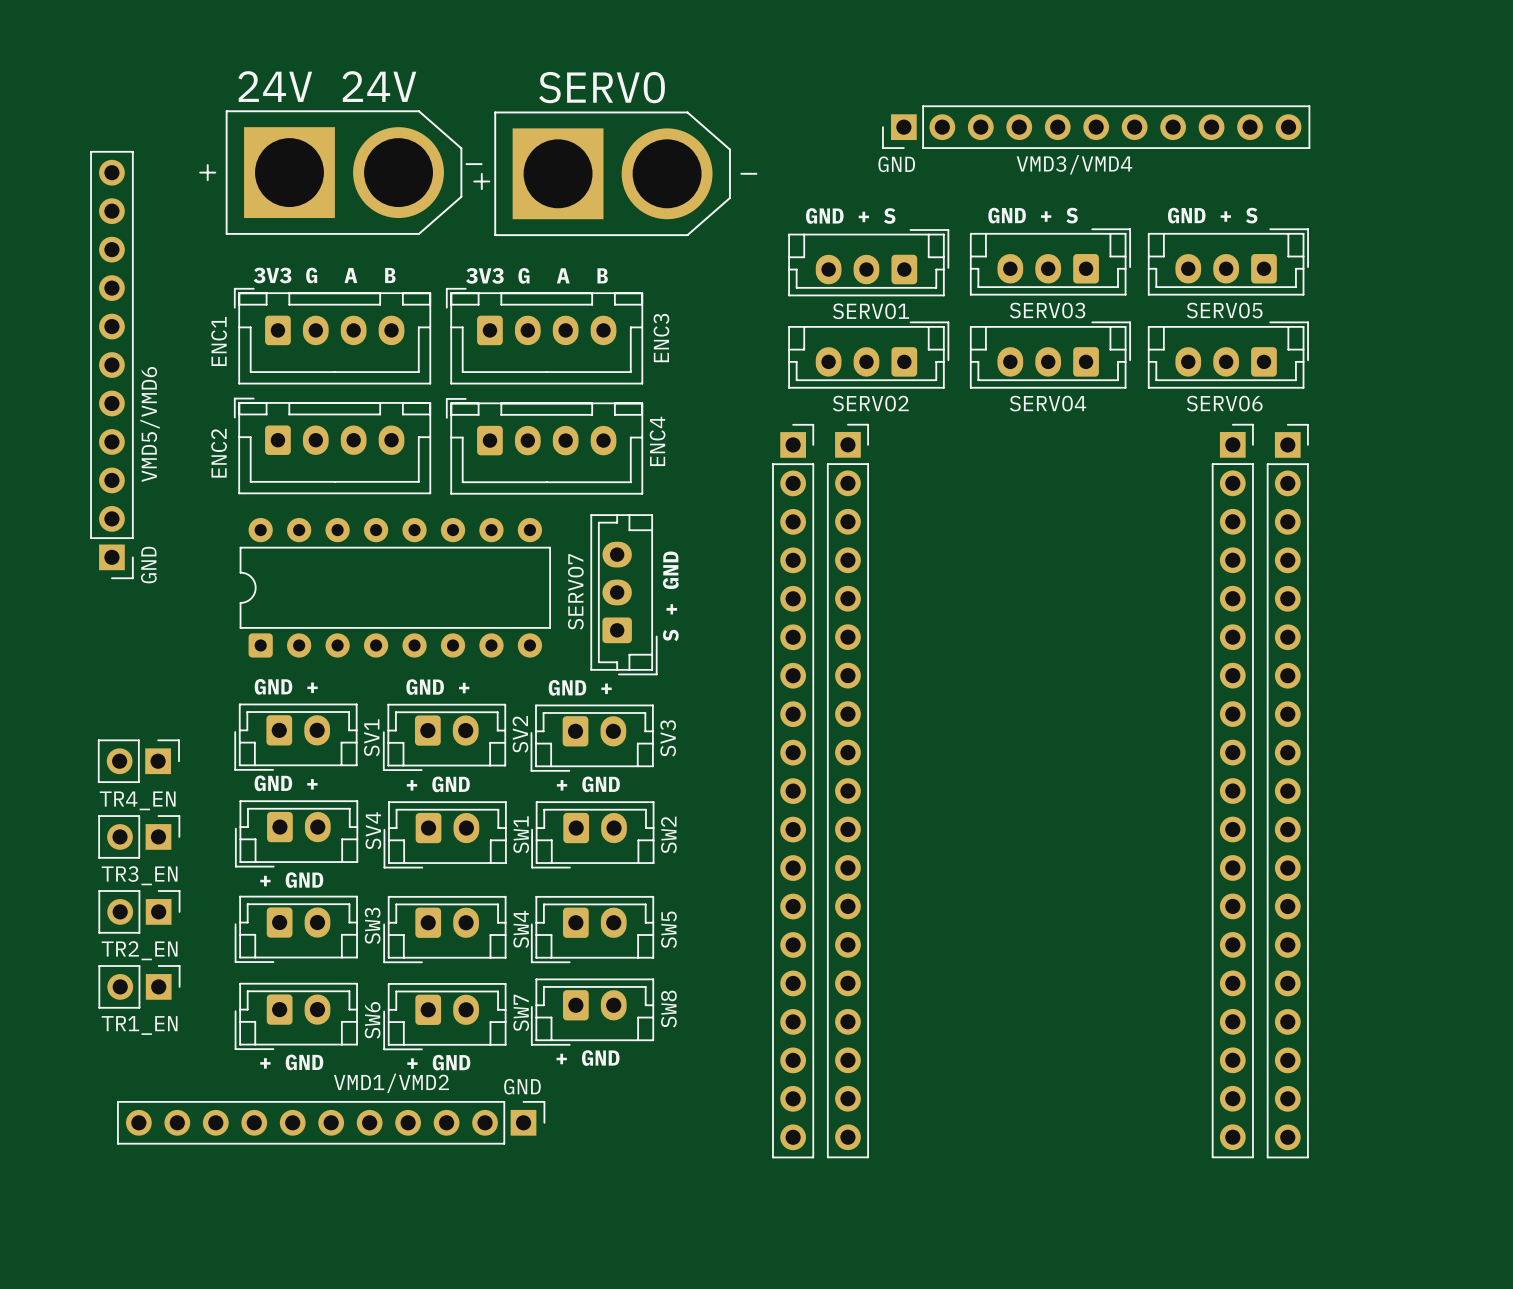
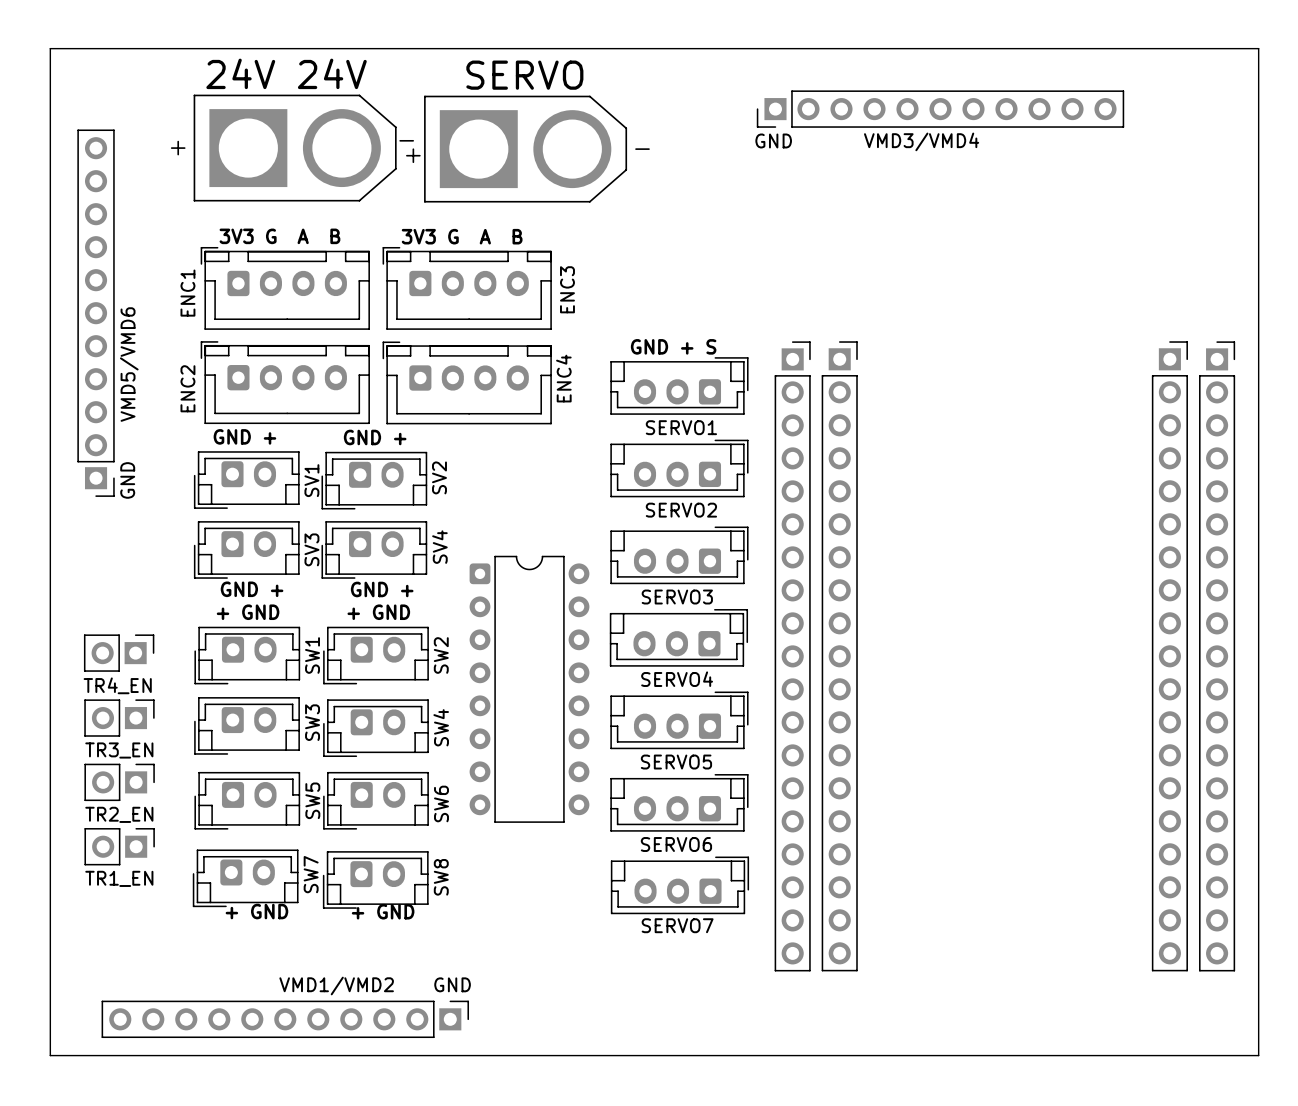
board edge: none -> (50, 48) (1258, 48) (1258, 1055) (50, 1055) (50, 48)
text: GND + S (850, 215) -> none
text: GND + S (1033, 215) -> none
text: GND + S (1212, 215) -> none
SERVO3 position: (1050, 261) -> (679, 555)
SERVO5 position: (1228, 261) -> (679, 720)
SERVO1 position: (868, 262) -> (679, 385)
SERVO2 position: (868, 355) -> (679, 468)
SERVO4 position: (1050, 355) -> (678, 637)
SERVO6 position: (1228, 355) -> (679, 802)
text: none -> GND + S (673, 346)
text: none -> GND + (244, 436)
text: none -> GND + (375, 437)
part rotation: 0° (395, 587) -> 90° clockwise (529, 689)
part position: (395, 587) -> (529, 689)
SERVO7 rotation: 0° (623, 594) -> 90° counterclockwise (679, 885)
SERVO7 position: (623, 594) -> (679, 885)
text: S + GND (670, 596) -> none
text: GND + (580, 687) -> none
text: none -> + GND (248, 612)
SV1 position: (295, 737) -> (246, 480)
SV2 position: (444, 737) -> (374, 480)
SV3 position: (592, 738) -> (246, 549)
part: none -> (839, 656)
part: none -> (1169, 656)
part: none -> (792, 656)
part: none -> (1217, 656)
text: GND + (286, 783) -> none
text position: + GND (438, 784) -> + GND (378, 612)
text: + GND (588, 784) -> none
part: (793, 791) -> none
part: (847, 791) -> none
part: (1232, 791) -> none
part: (1287, 791) -> none
SV4 position: (296, 833) -> (374, 549)
SW1 position: (445, 834) -> (247, 655)
SW2 position: (592, 834) -> (376, 655)
text: + GND (291, 880) -> none
SW3 position: (296, 929) -> (247, 725)
SW4 position: (444, 929) -> (376, 728)
SW5 position: (592, 929) -> (247, 800)
SW8 position: (592, 1012) -> (375, 879)
SW6 position: (296, 1016) -> (376, 800)
SW7 position: (444, 1016) -> (245, 878)
text: + GND (588, 1058) -> none
text position: GND (522, 1086) -> GND (452, 984)
VMD1/VMD2 position: (331, 1122) -> (285, 1019)

